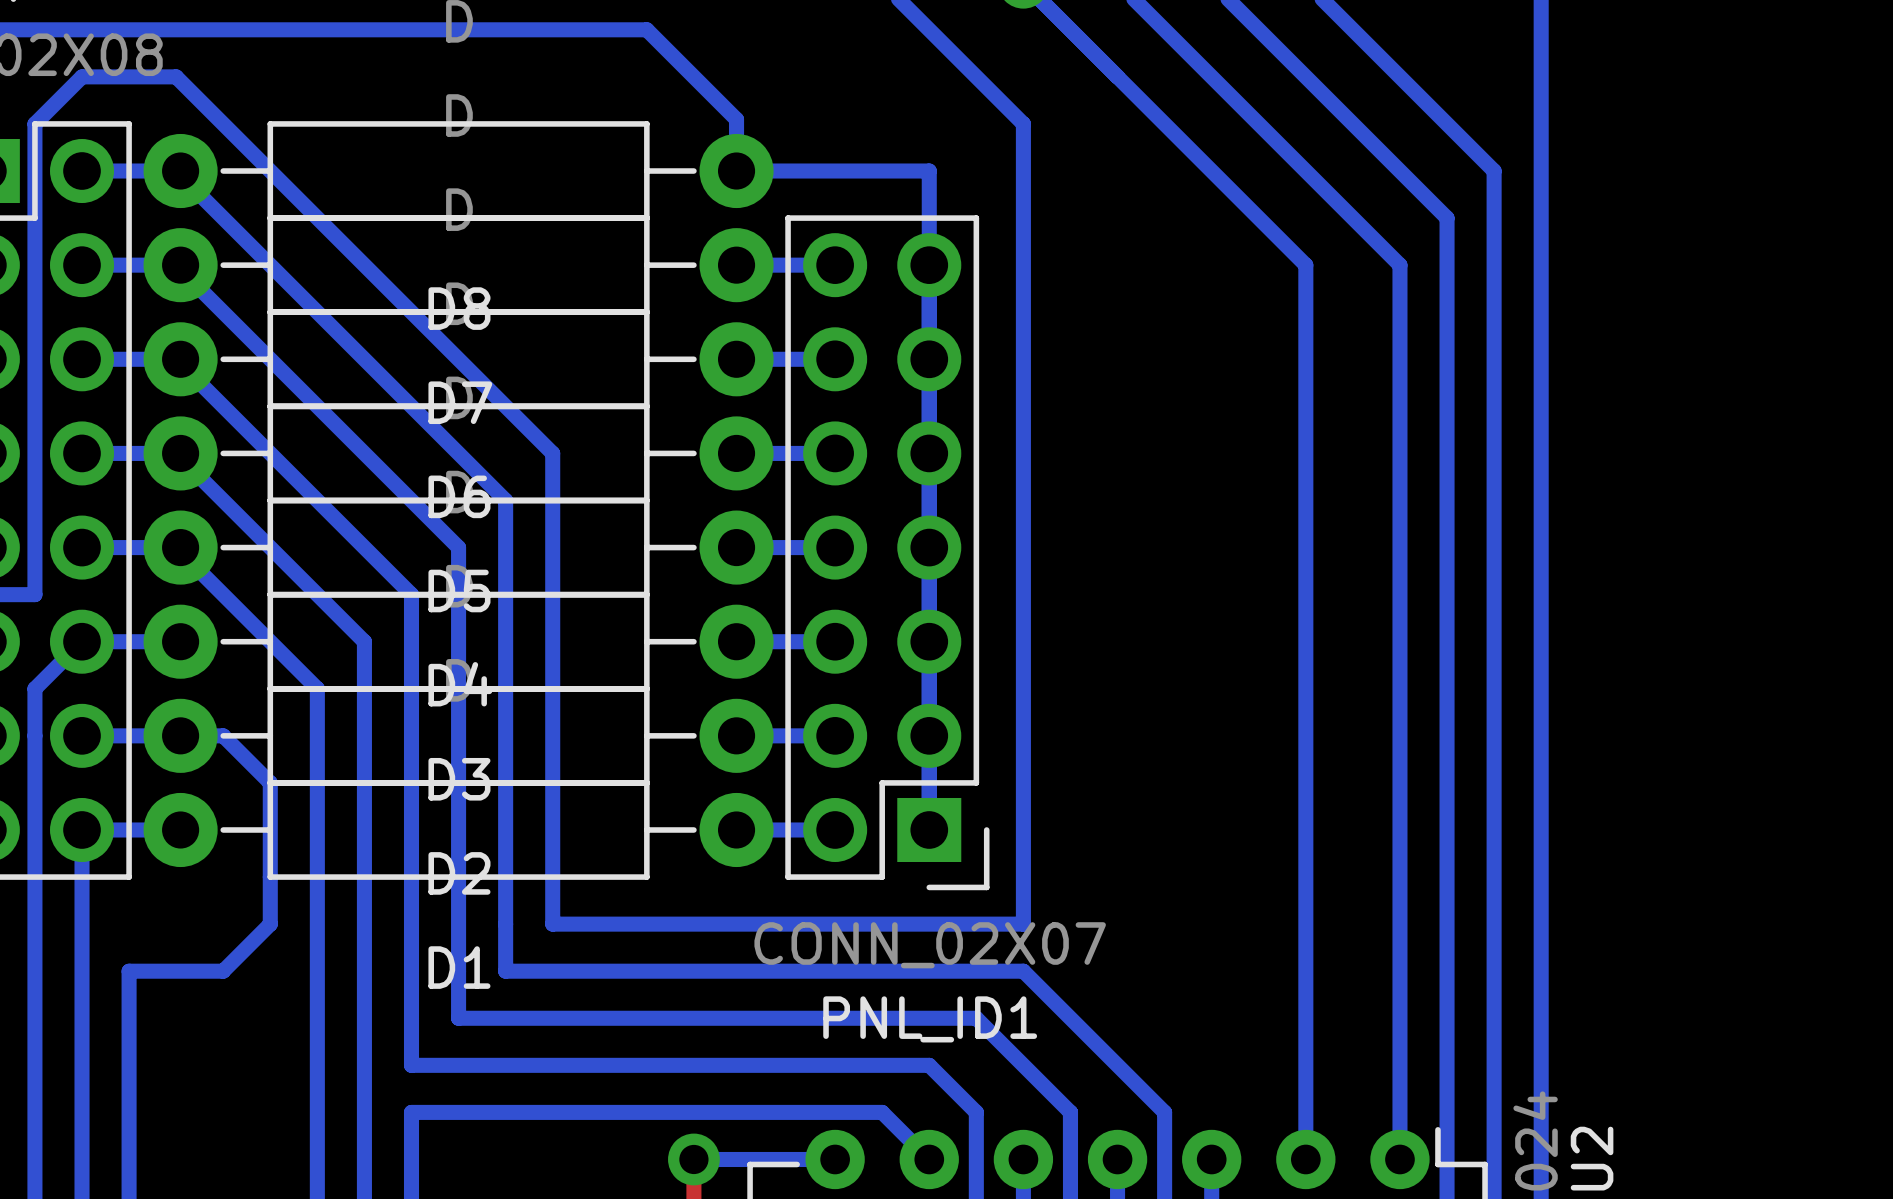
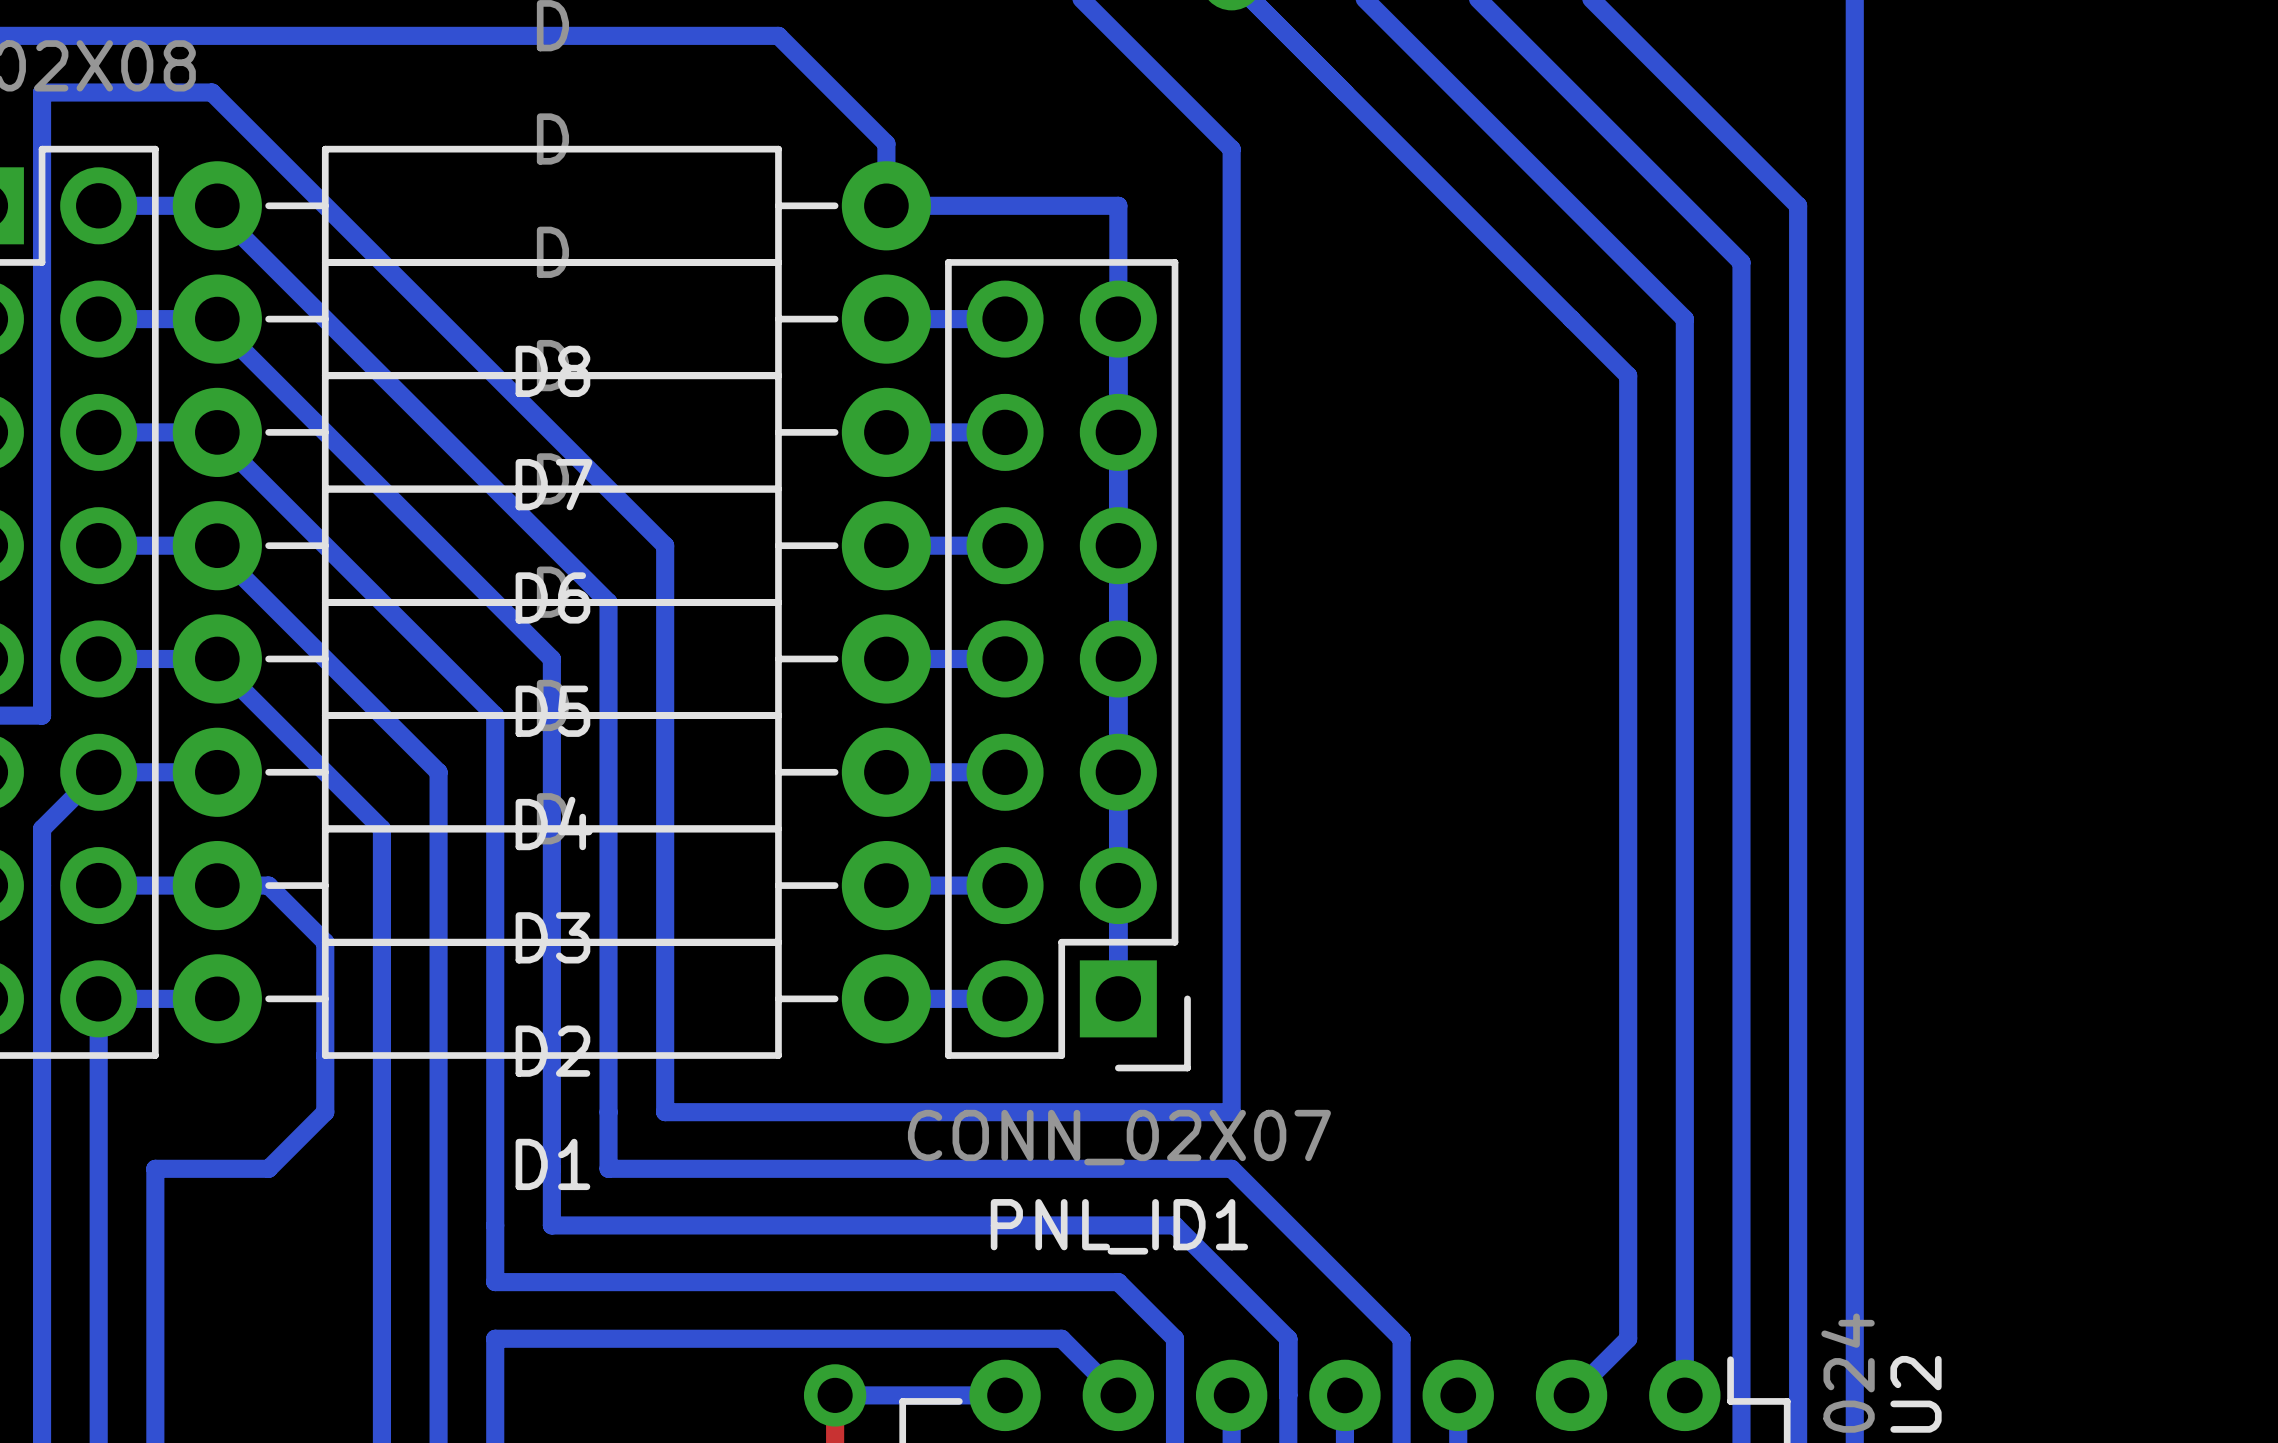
bottom track: (82, 76) (34, 123) -> (98, 92) (42, 92) (42, 149)
bottom track: (1305, 265) (1305, 1159) -> (1571, 319) (1628, 375) (1628, 1338) (1571, 1395)

